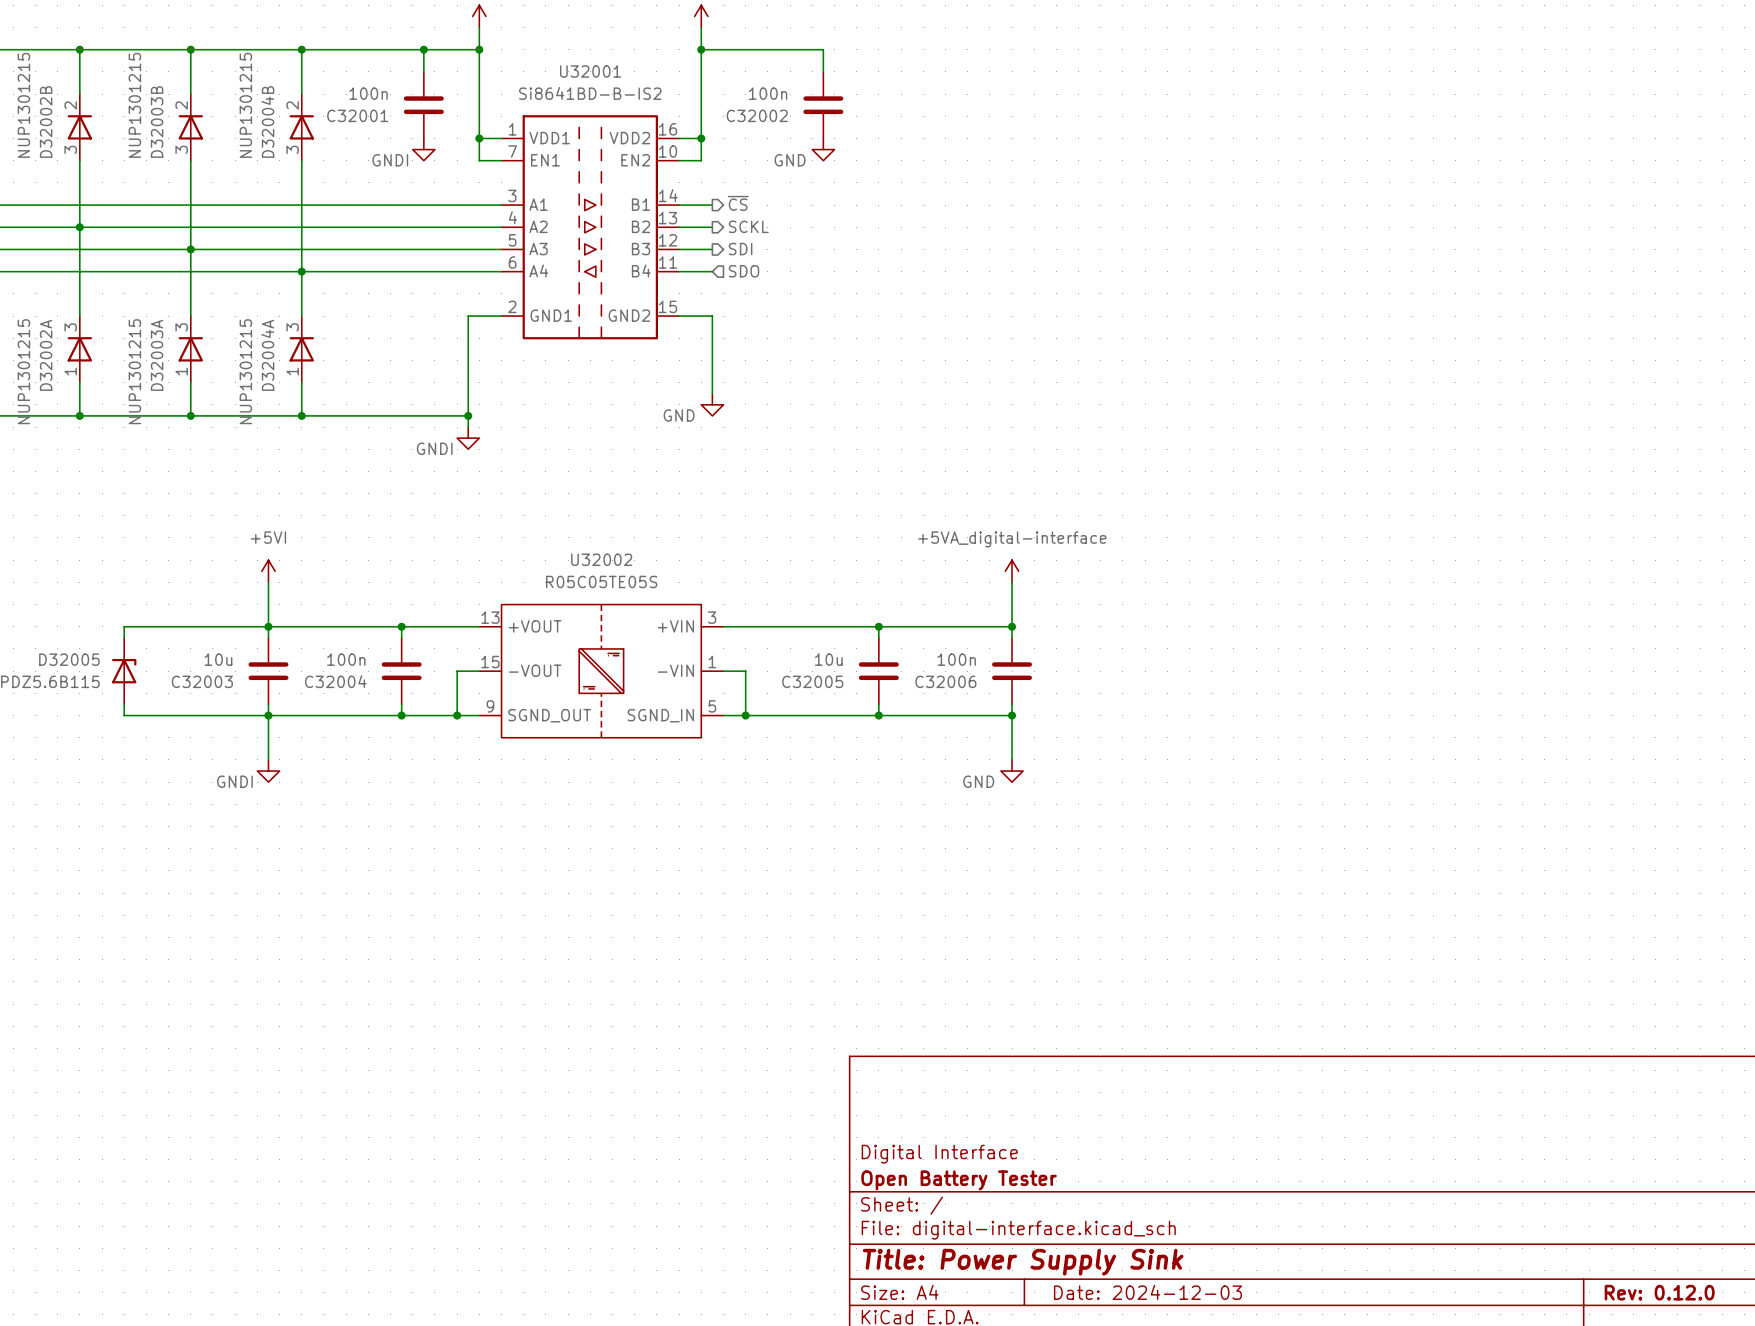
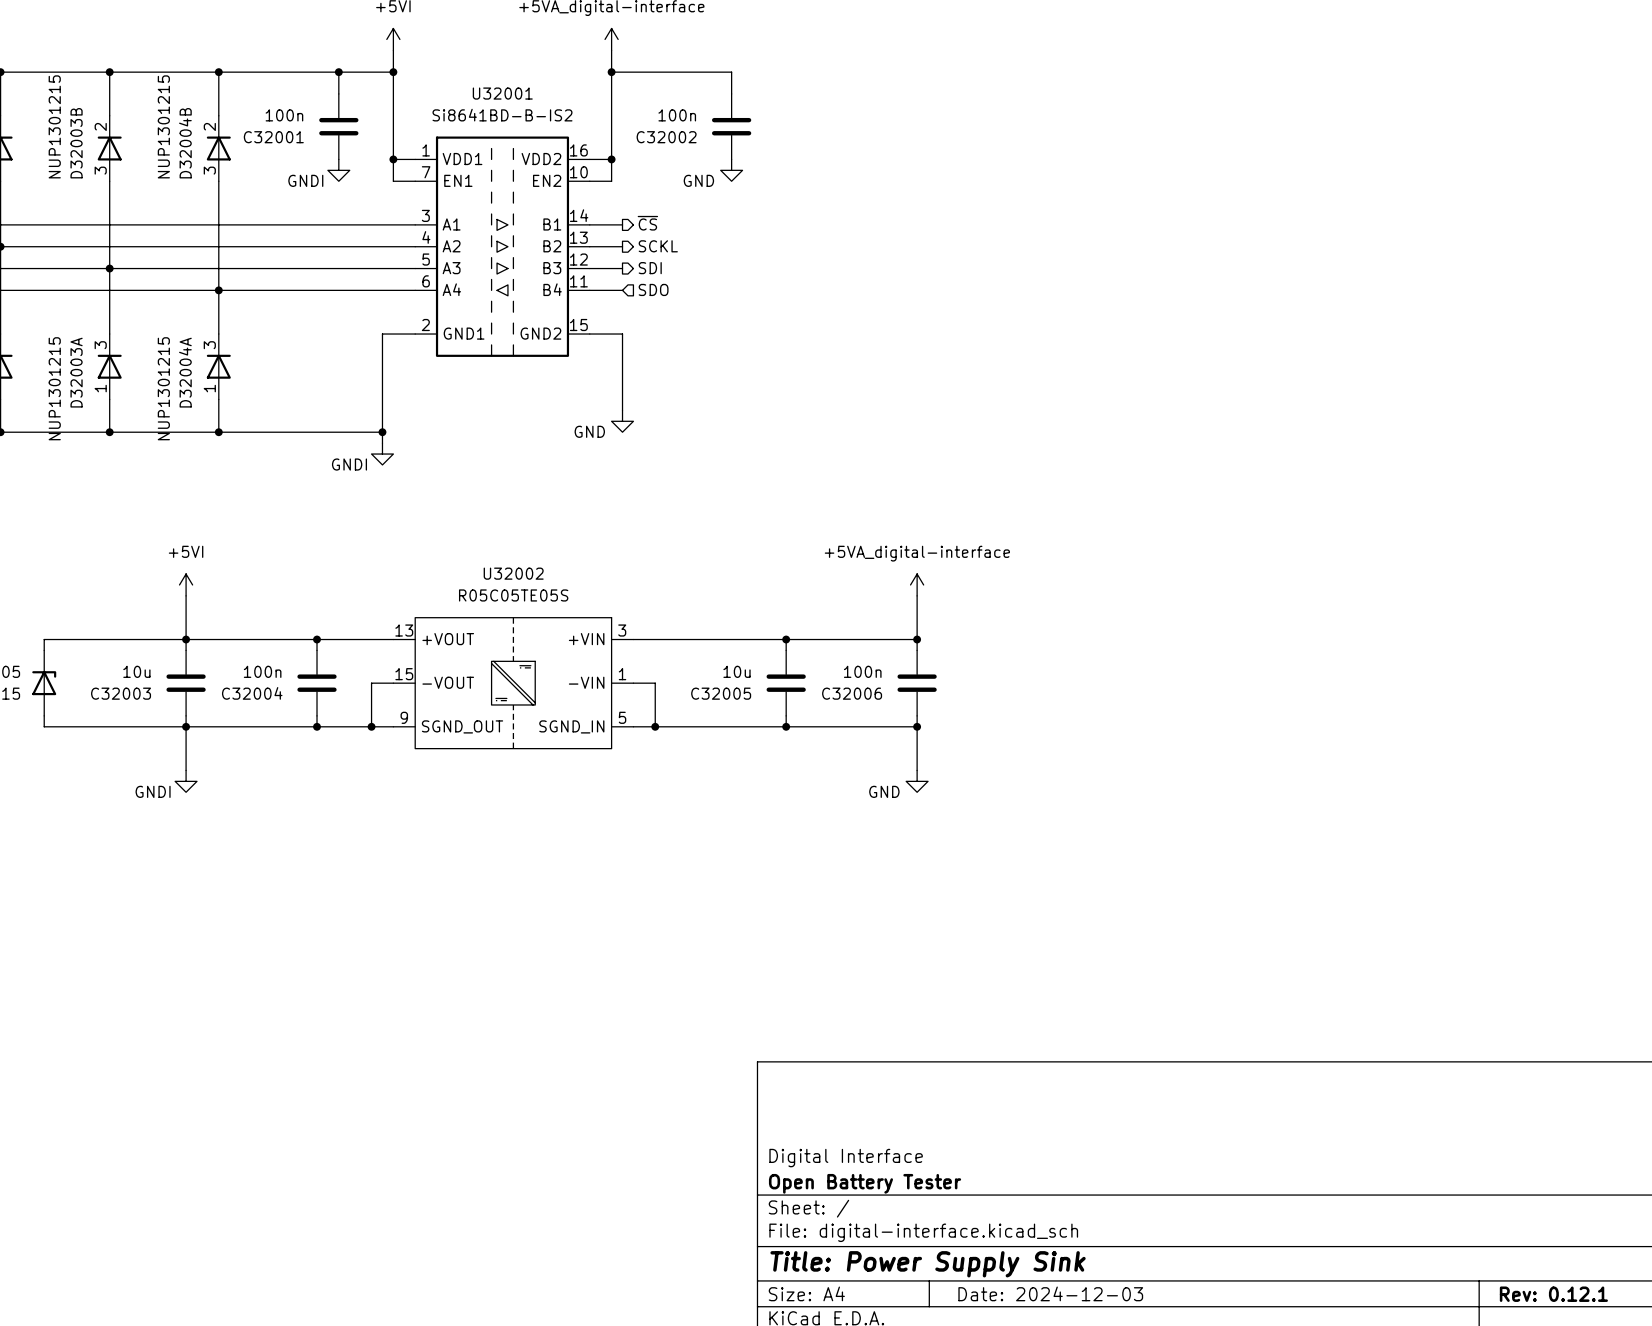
title block: Rev: 0.12.0 (1659, 1292) -> Rev: 0.12.1 (1553, 1294)

